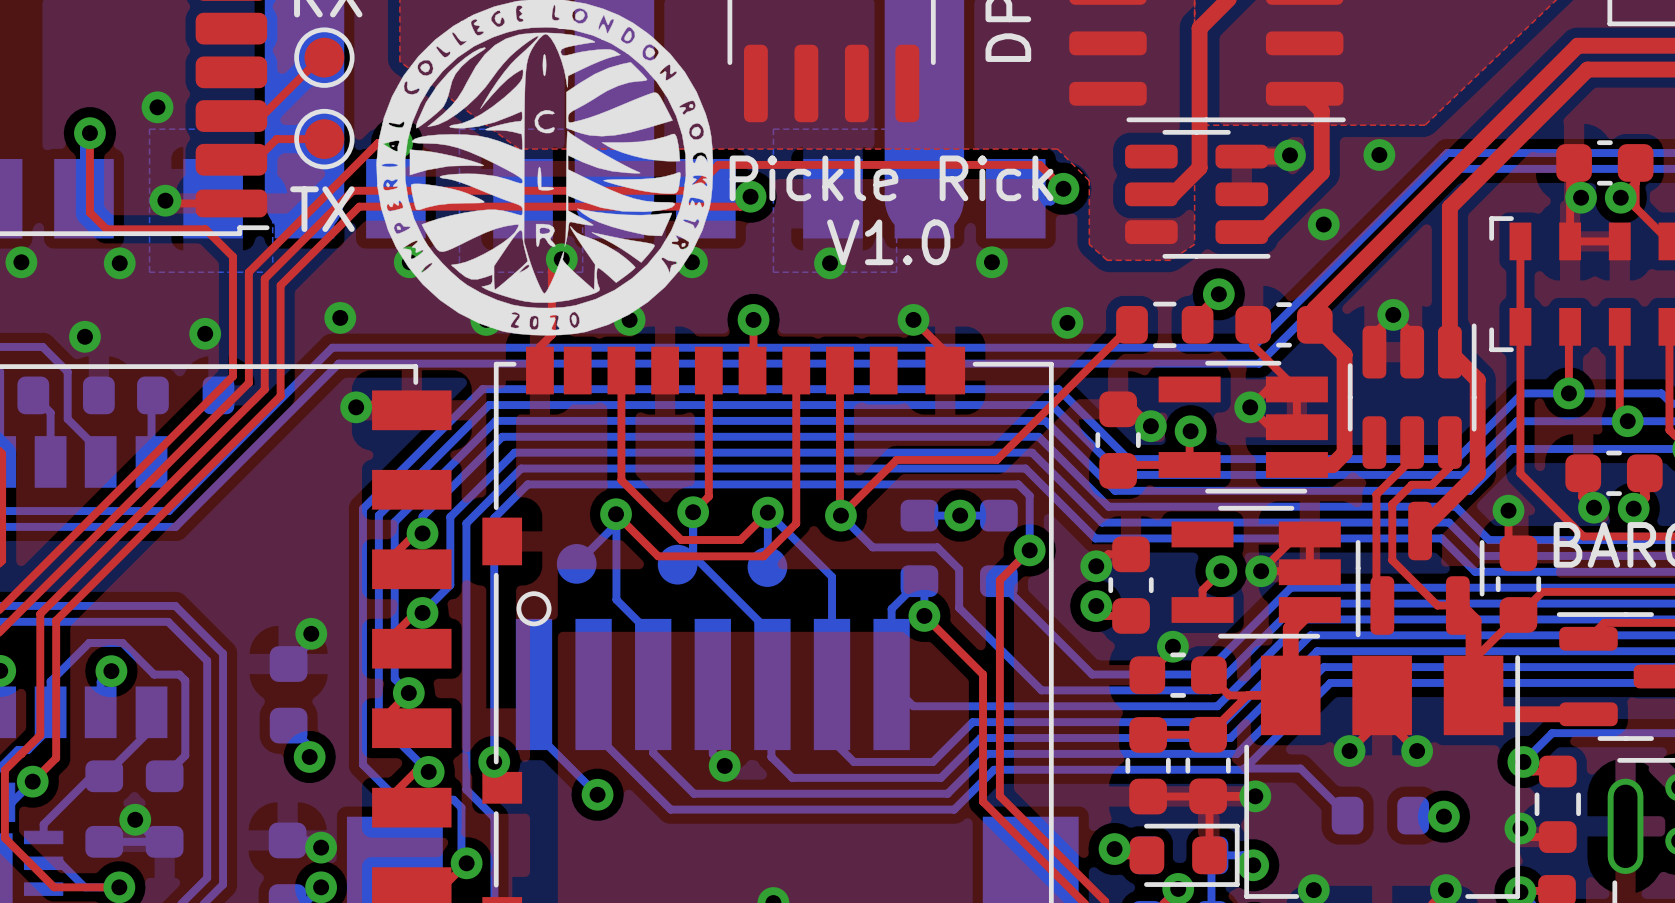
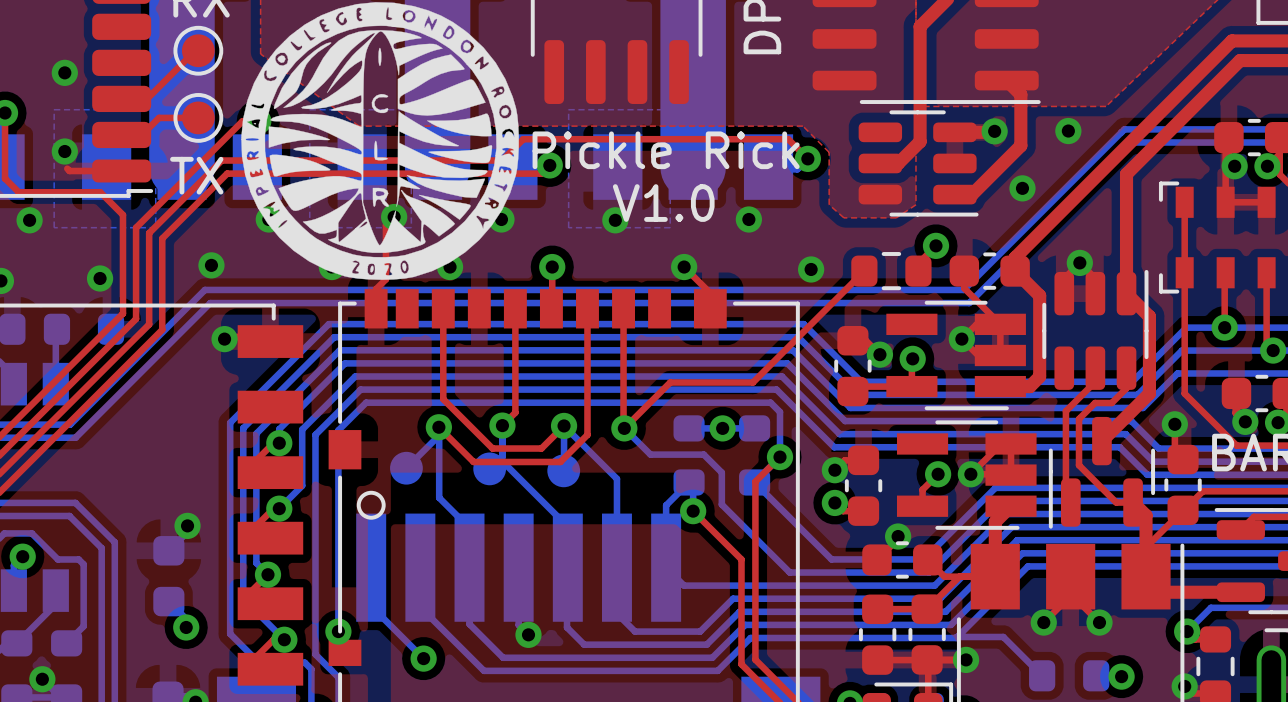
via position: (157, 107) -> (64, 72)
via position: (165, 200) -> (64, 151)

